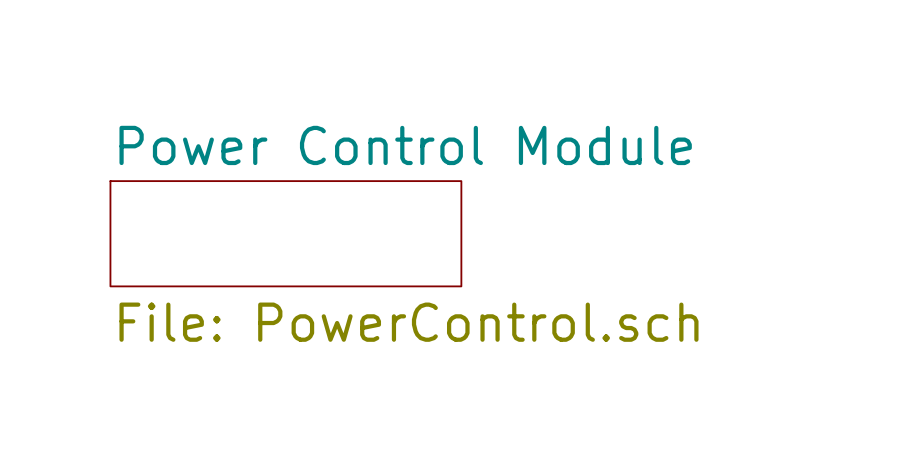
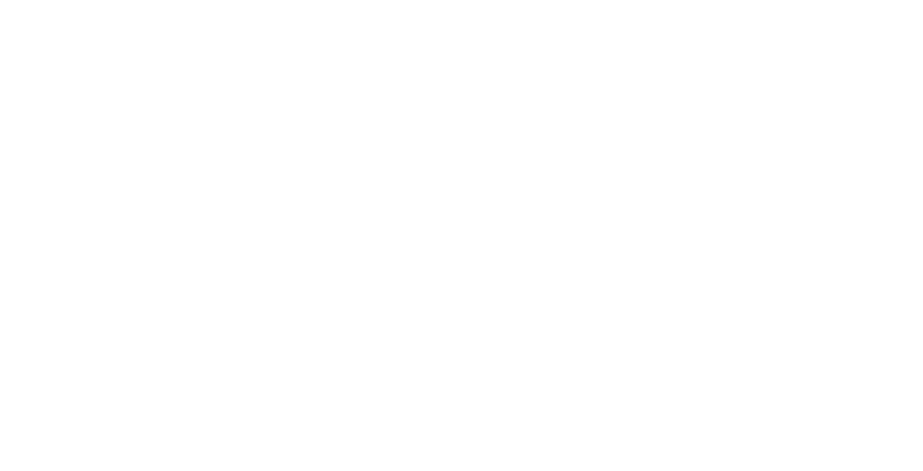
sheet Power Control Module: File: PowerControl.sch (285, 233) -> none

